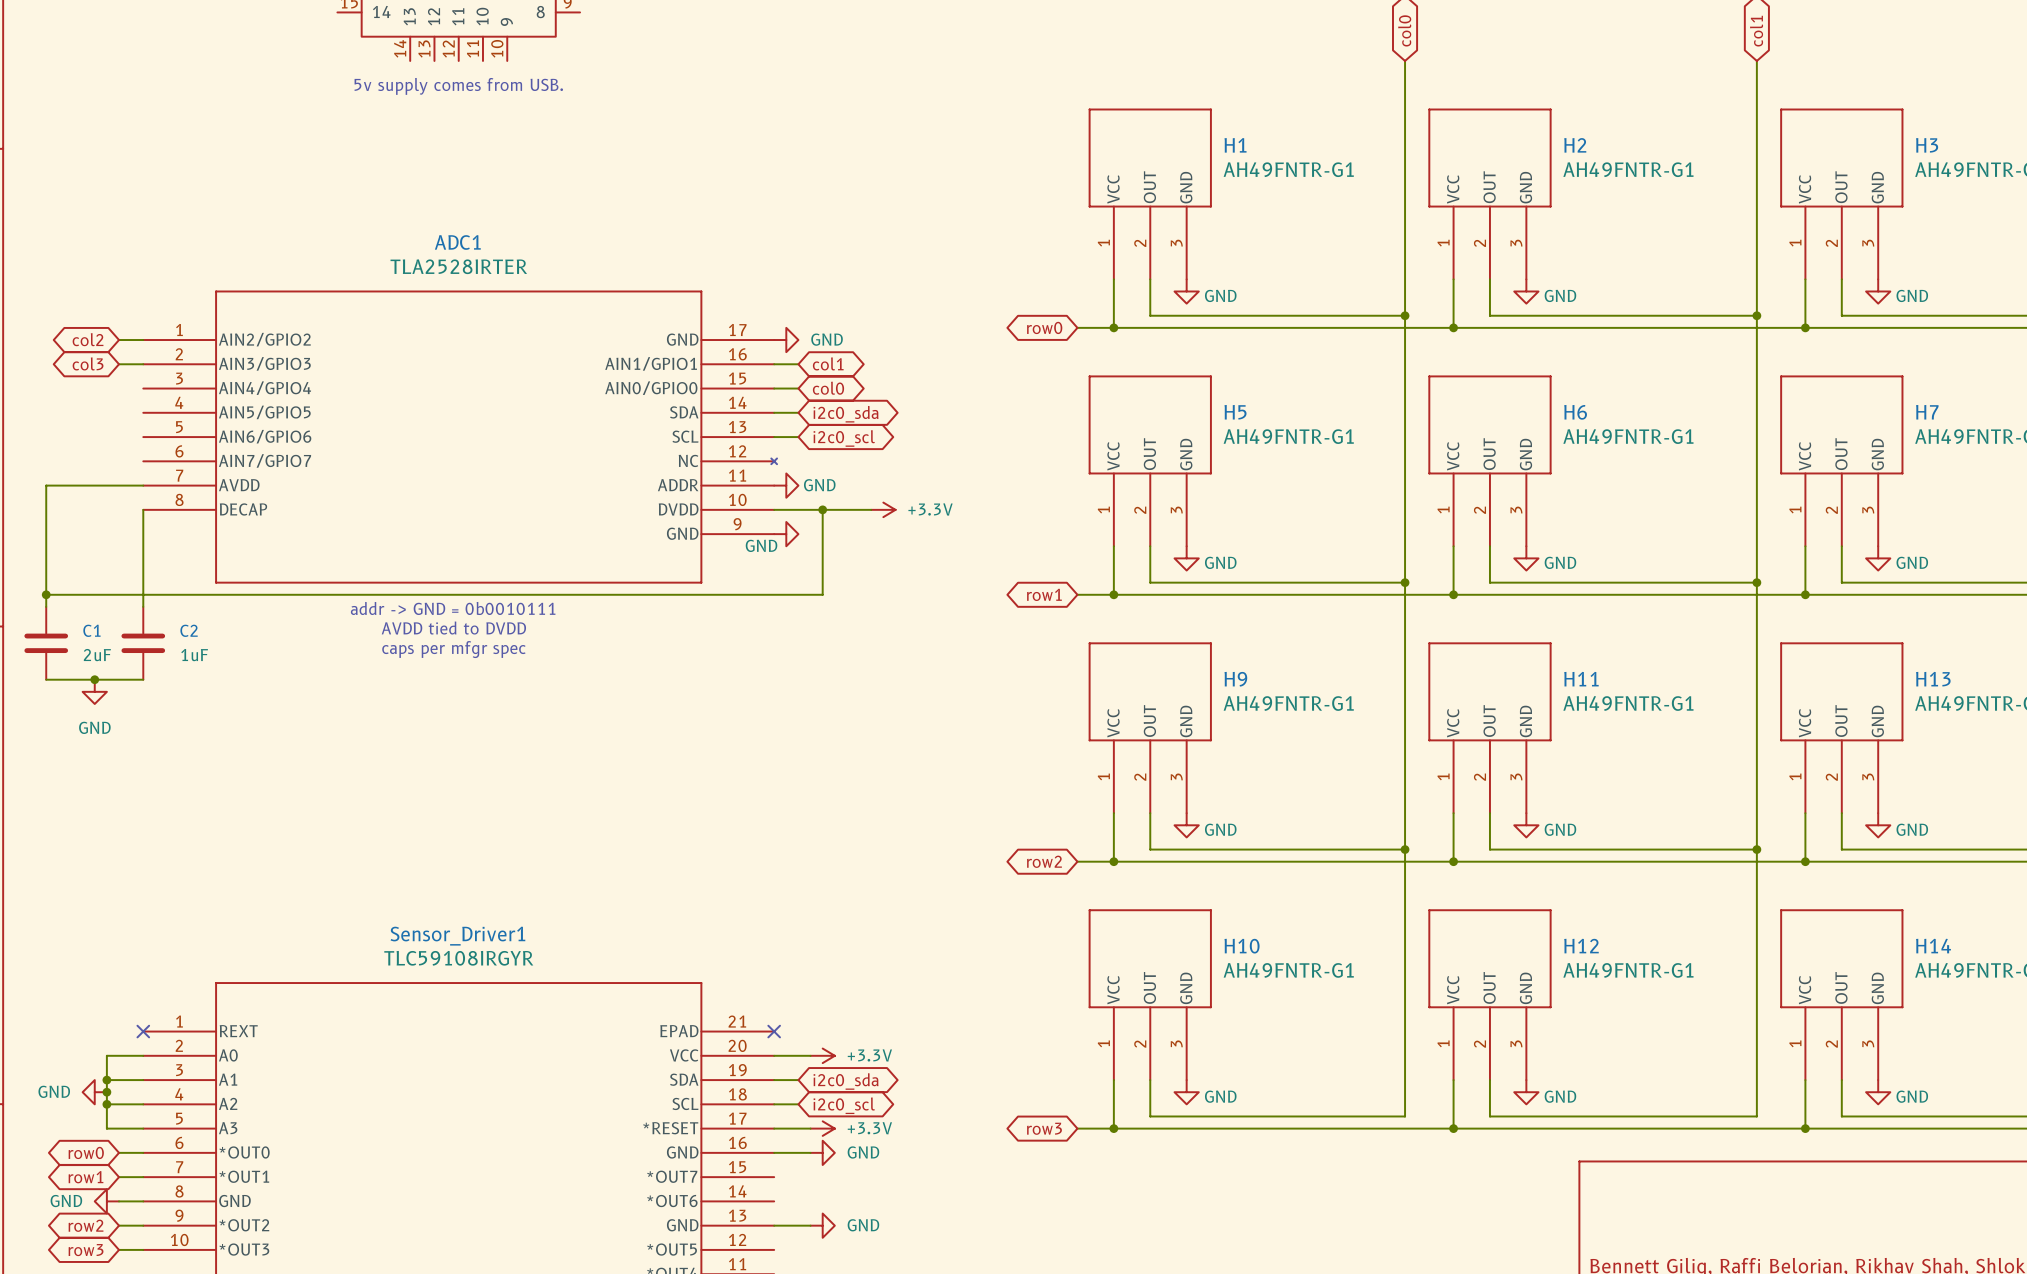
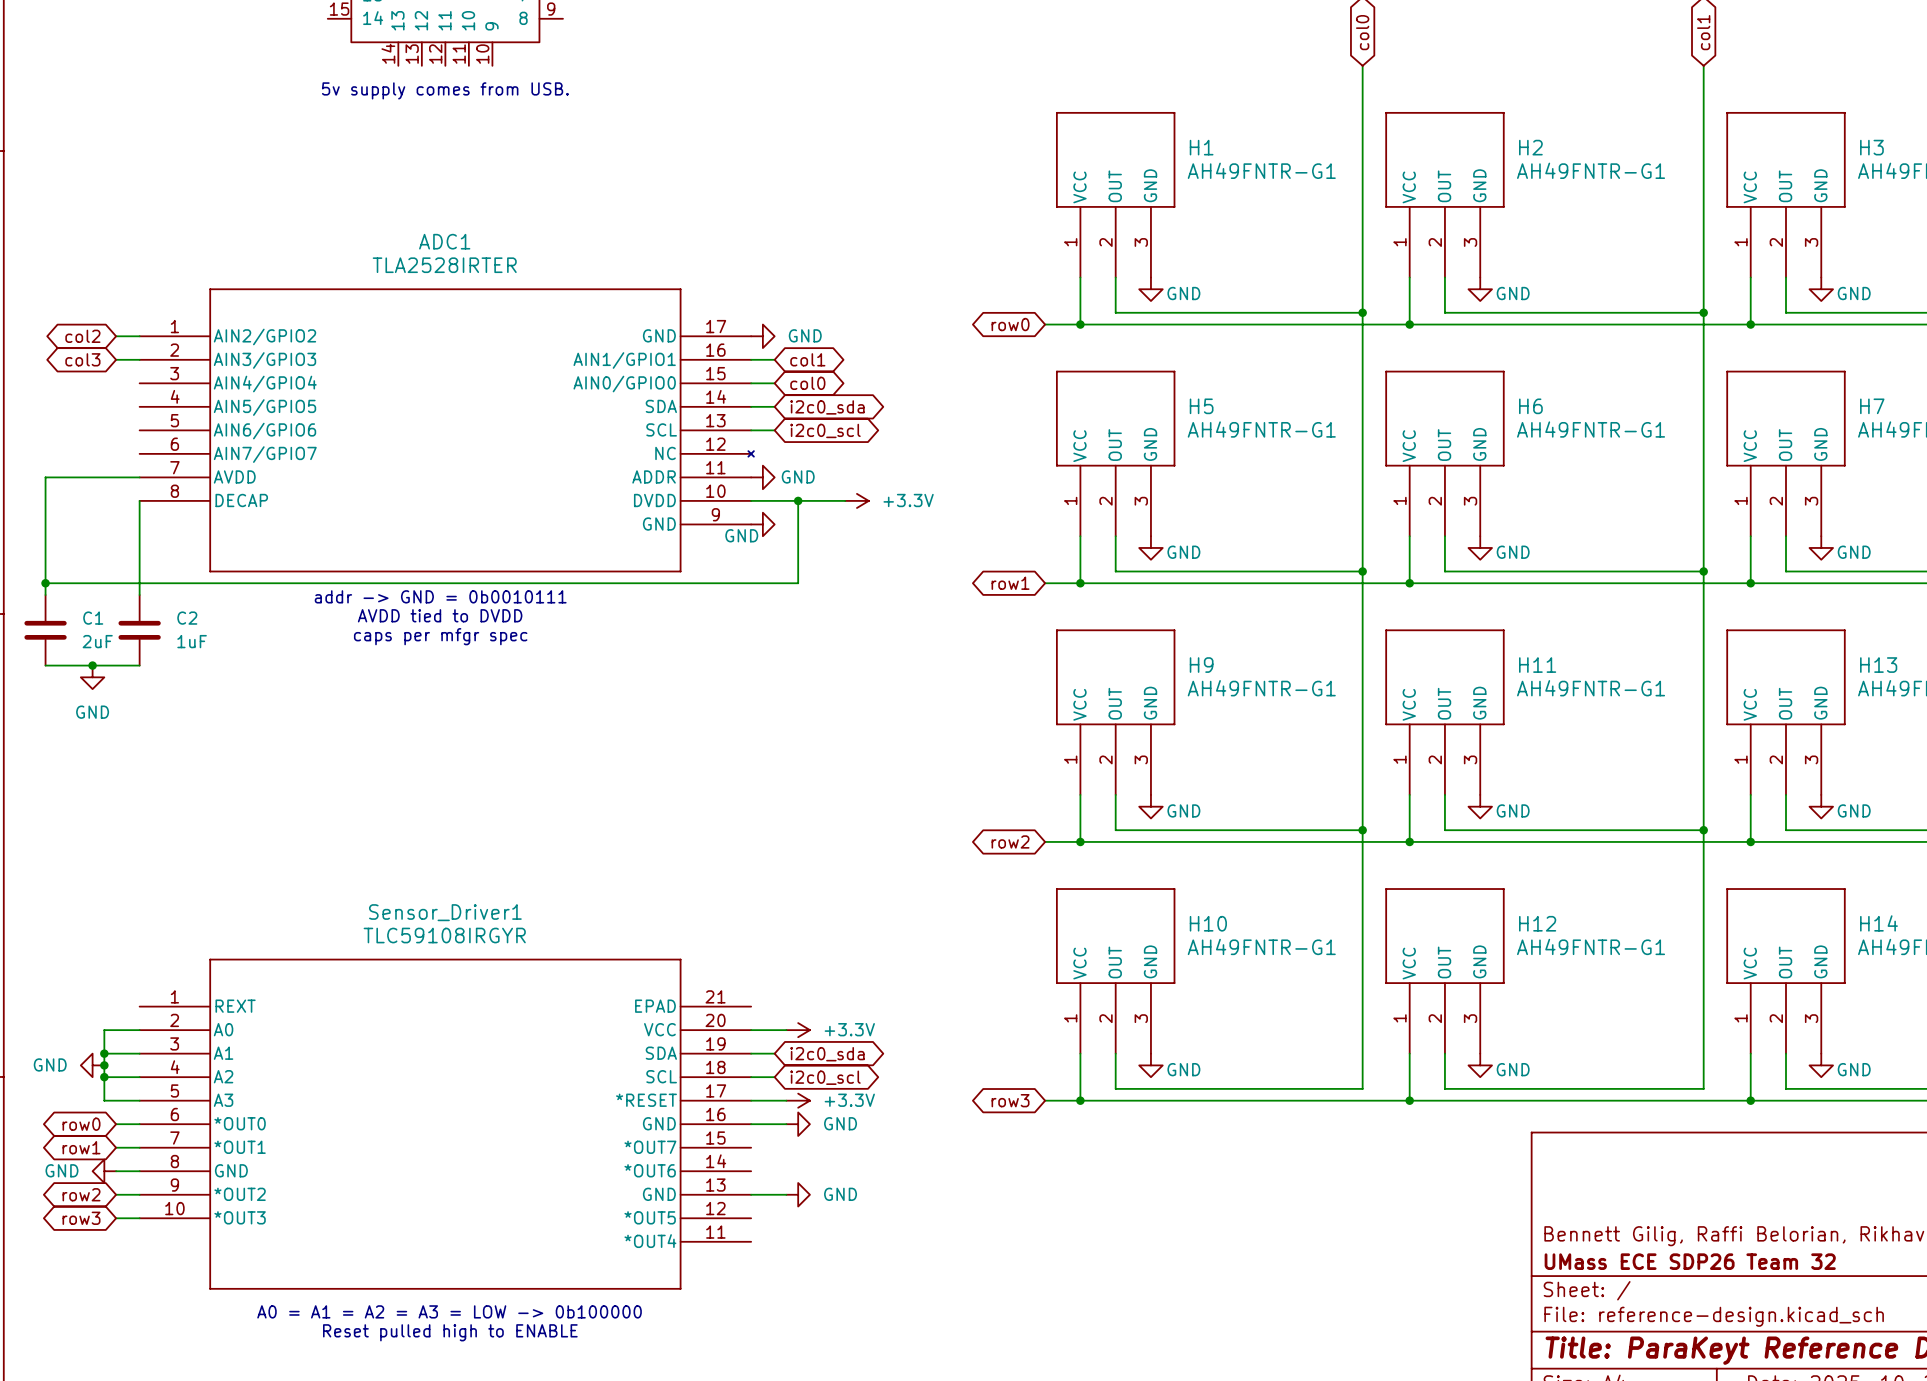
no-connect mark: (143, 1031) -> none
no-connect mark: (774, 1031) -> none

